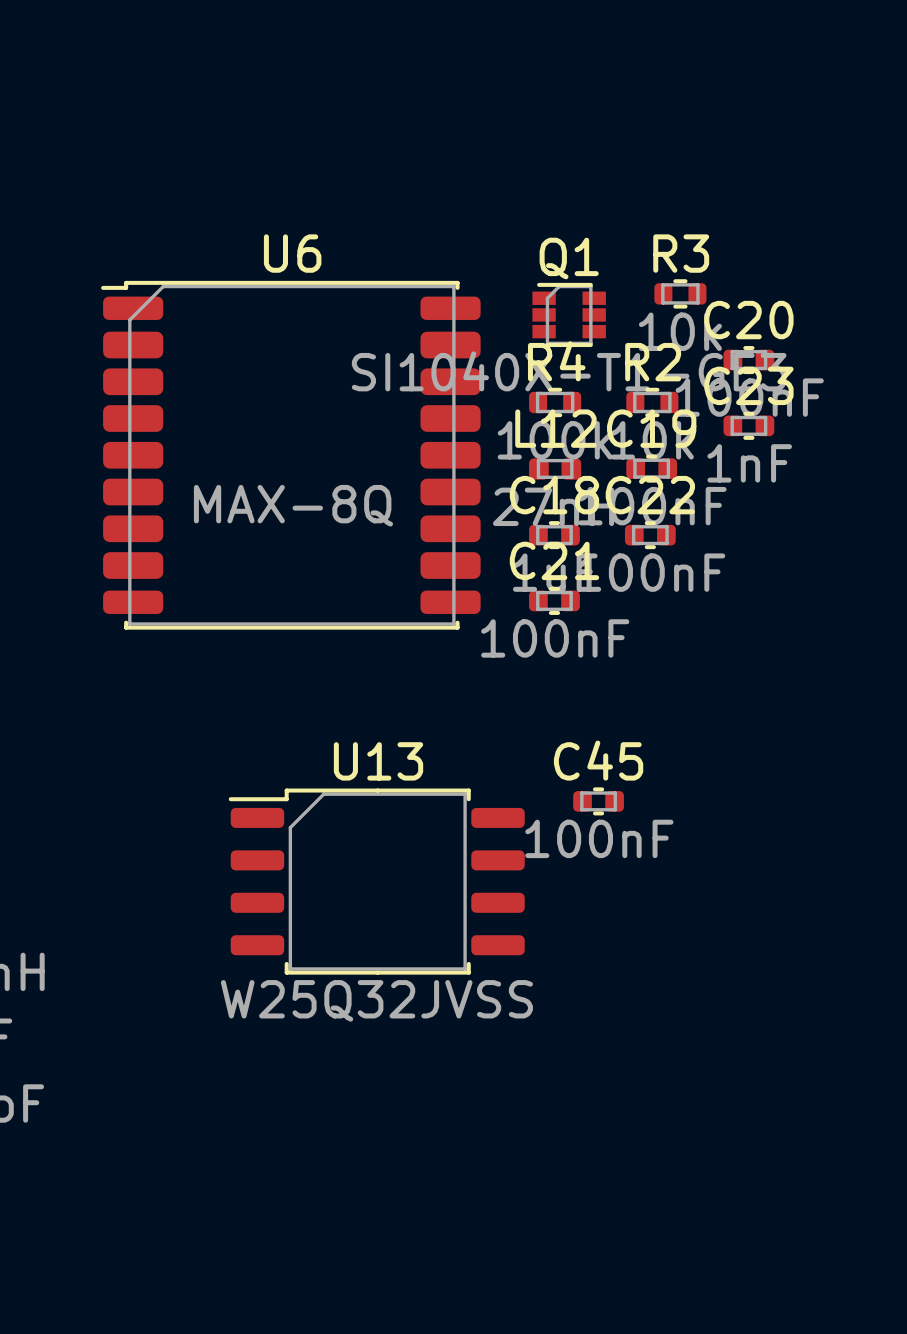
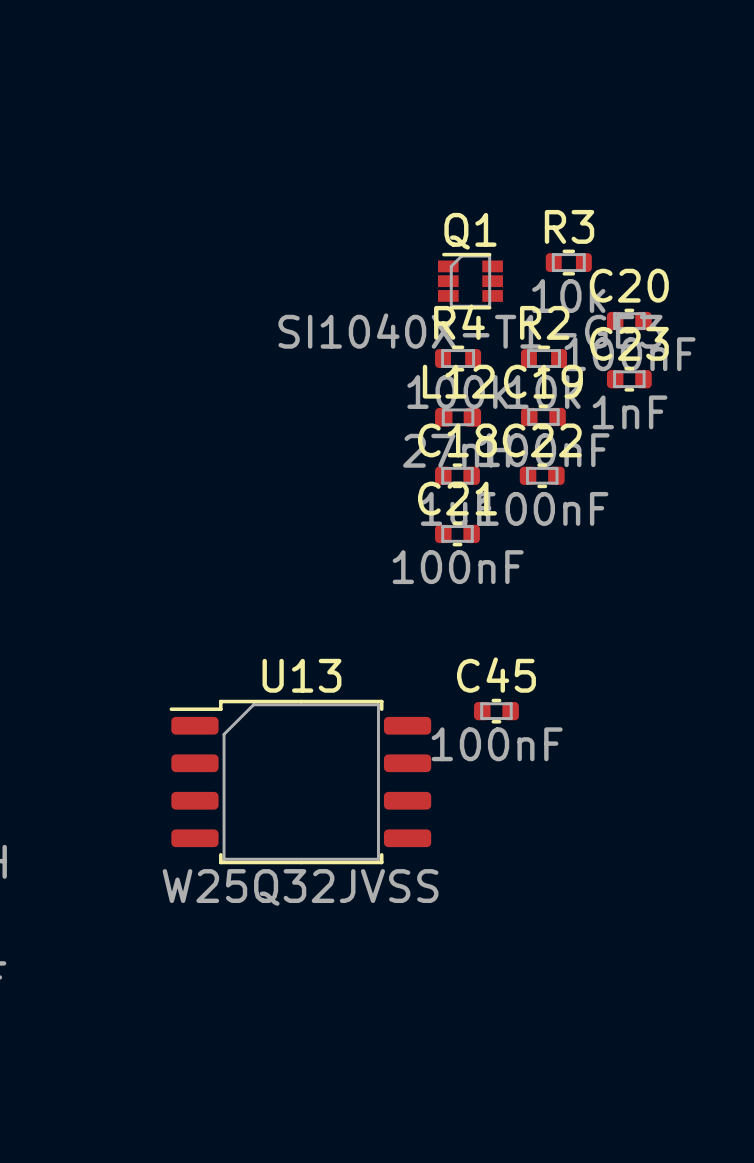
U6: MAX-8Q (290, 455) -> none

